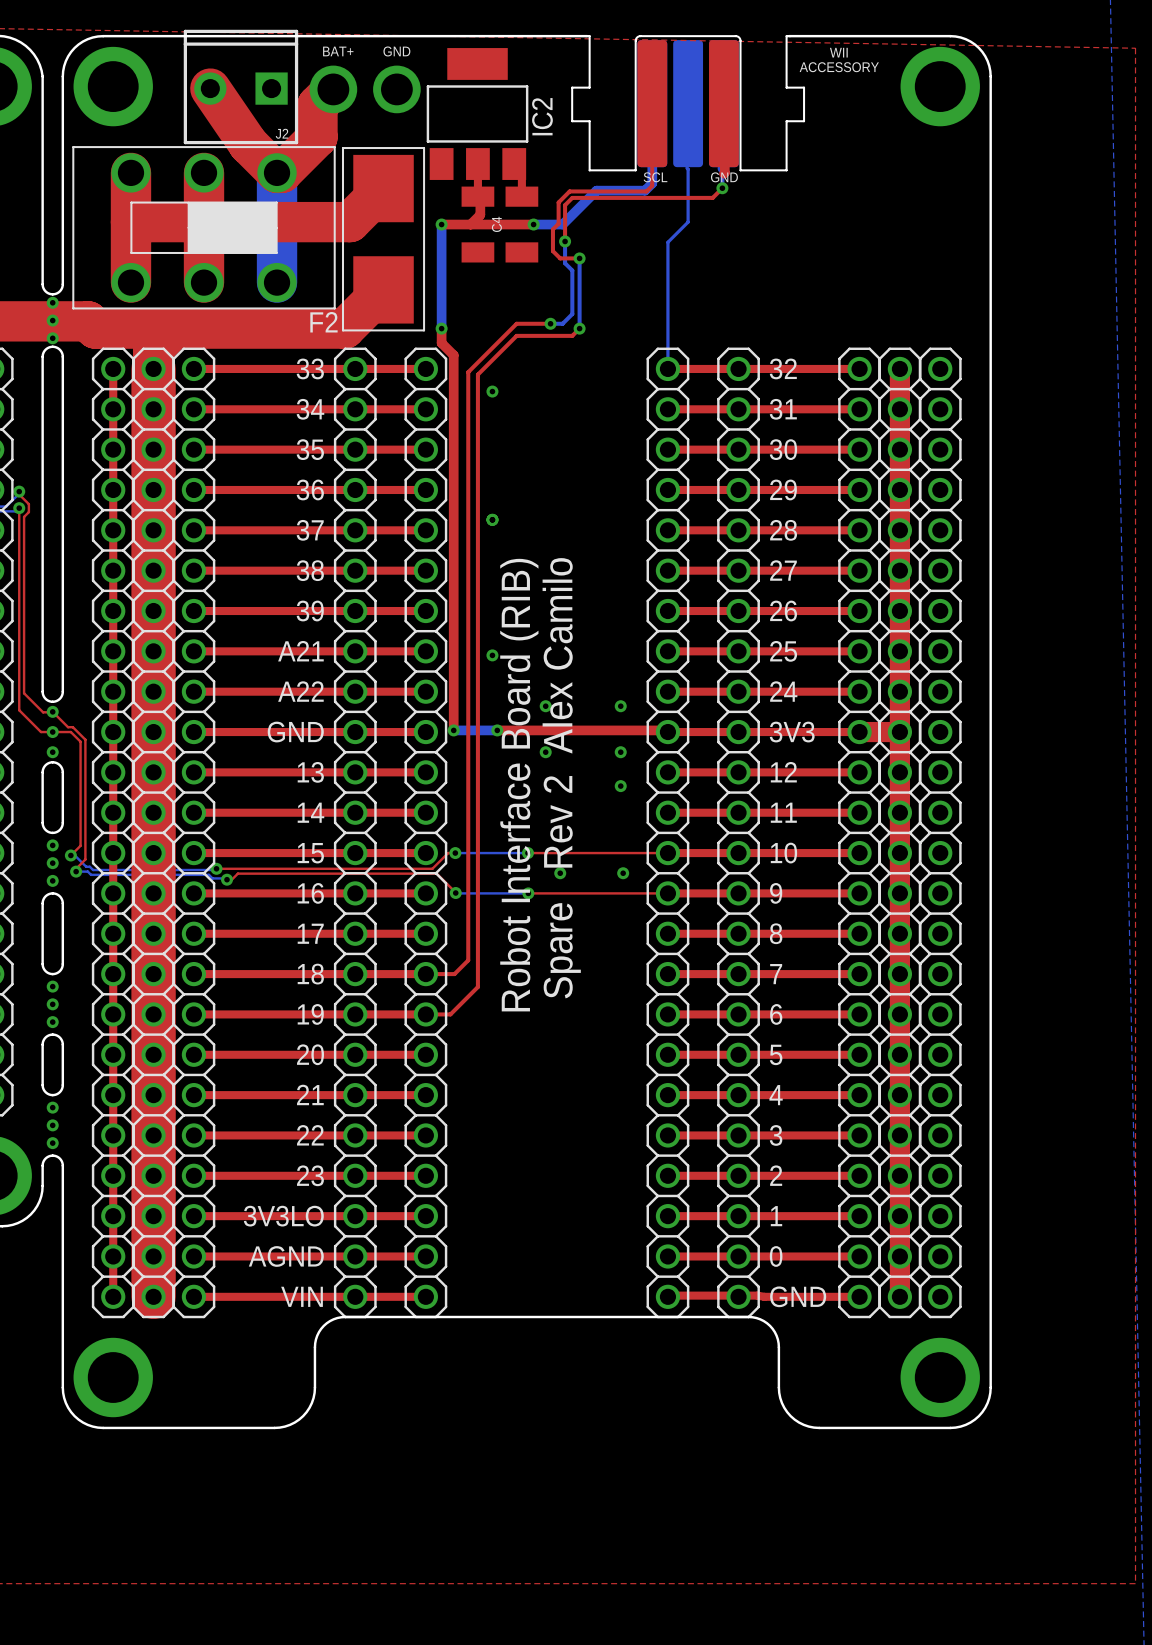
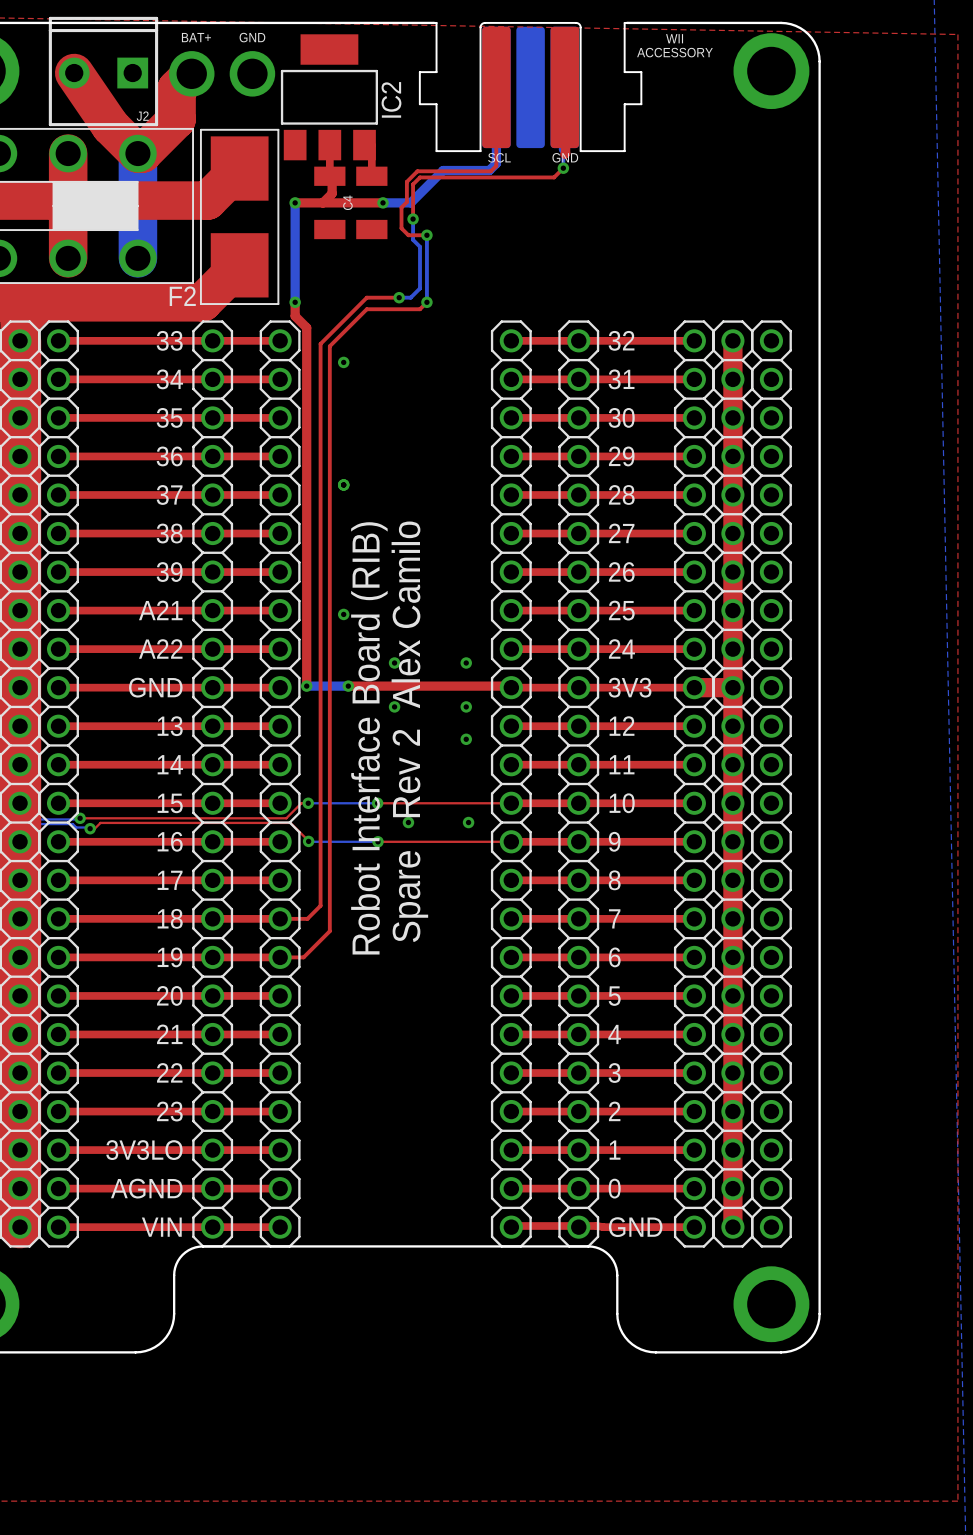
bottom track: (686, 168) (688, 222) (667, 242) (667, 368) -> none

